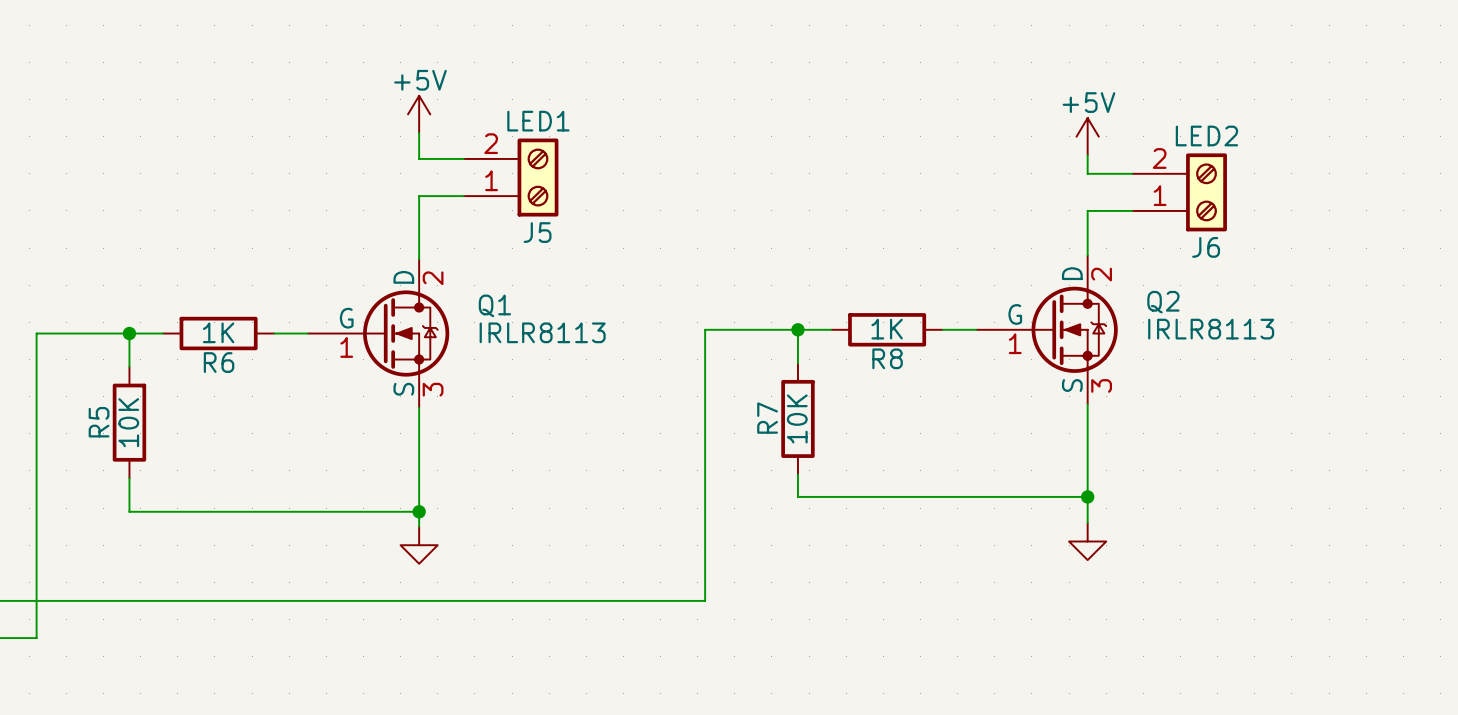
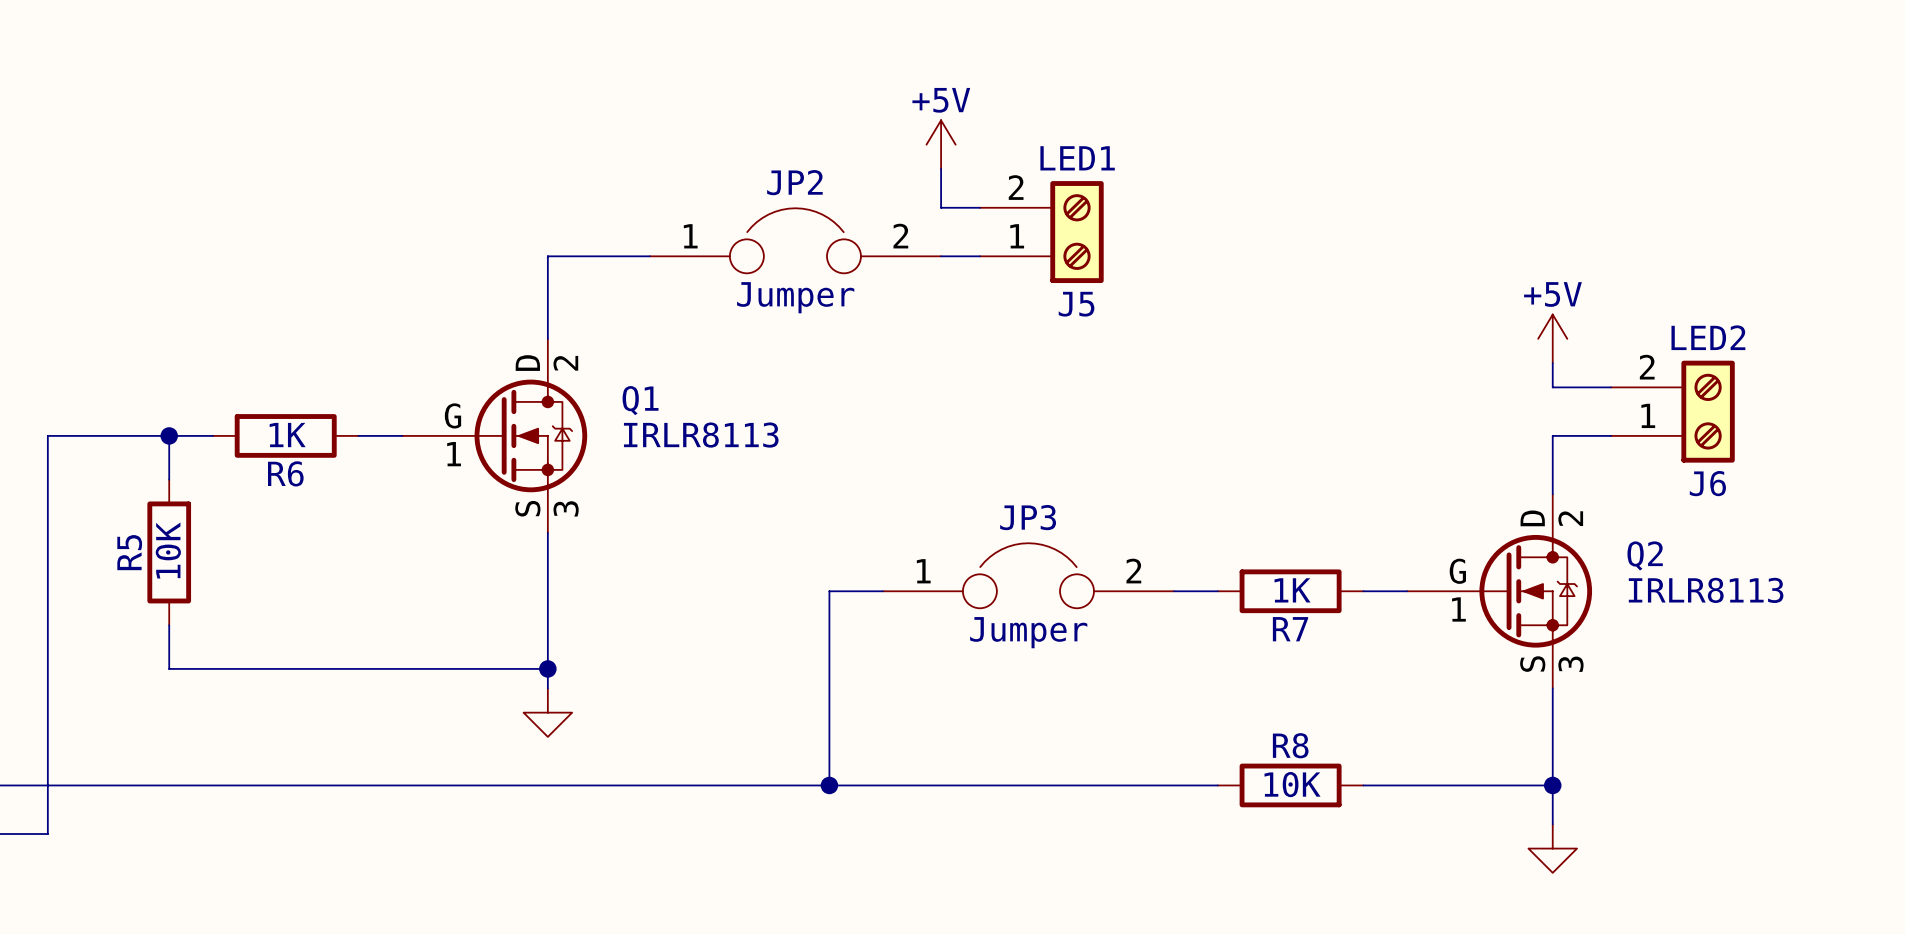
power symbol: none -> +5V (941, 144)
power symbol: +5V (419, 114) -> none
wire: none -> (941, 168) (941, 207) (979, 207)
wire: (419, 132) (419, 158) (463, 158) -> none
power symbol position: +5V (1087, 136) -> +5V (1552, 338)
wire: (1087, 155) (1087, 173) (1132, 173) -> (1552, 363) (1552, 387) (1610, 387)
J5 position: (511, 177) -> (1041, 232)
JP2: none -> Jumper (795, 240)
J6 position: (1179, 192) -> (1672, 411)
wire: none -> (941, 256) (979, 256)
wire: (1132, 210) (1087, 210) (1087, 255) -> (1610, 435) (1552, 435) (1552, 494)
wire: (797, 329) (797, 363) -> none
junction: (797, 329) -> none
wire: (831, 329) (705, 329) (705, 600) -> (1217, 785) (921, 785)
R8 position: (887, 329) -> (1290, 785)
R8 value: 1K (887, 329) -> 10K (1292, 784)
wire: (942, 329) (976, 329) -> (1363, 591) (1407, 591)
Q2 position: (1046, 329) -> (1499, 591)
R8 name position: R8 (887, 358) -> R8 (1290, 745)
wire: (1087, 404) (1087, 522) -> none
R7 name position: R7 (767, 418) -> R7 (1290, 629)
R7 rotation: 0° (797, 418) -> 90° clockwise (1290, 591)
R7 position: (797, 418) -> (1290, 591)
R7 value: 10K (797, 418) -> 1K (1292, 590)
JP3: none -> Jumper (1028, 575)
wire: none -> (882, 591) (829, 591) (829, 785)
wire: none -> (1174, 591) (1217, 591)
wire: (797, 474) (797, 496) (1087, 496) -> none
junction: (1087, 496) -> none
wire: none -> (1552, 688) (1552, 824)
power symbol position: (1087, 541) -> (1552, 848)
junction: none -> (829, 785)
wire: none -> (1363, 785) (1552, 785)
junction: none -> (1552, 785)

